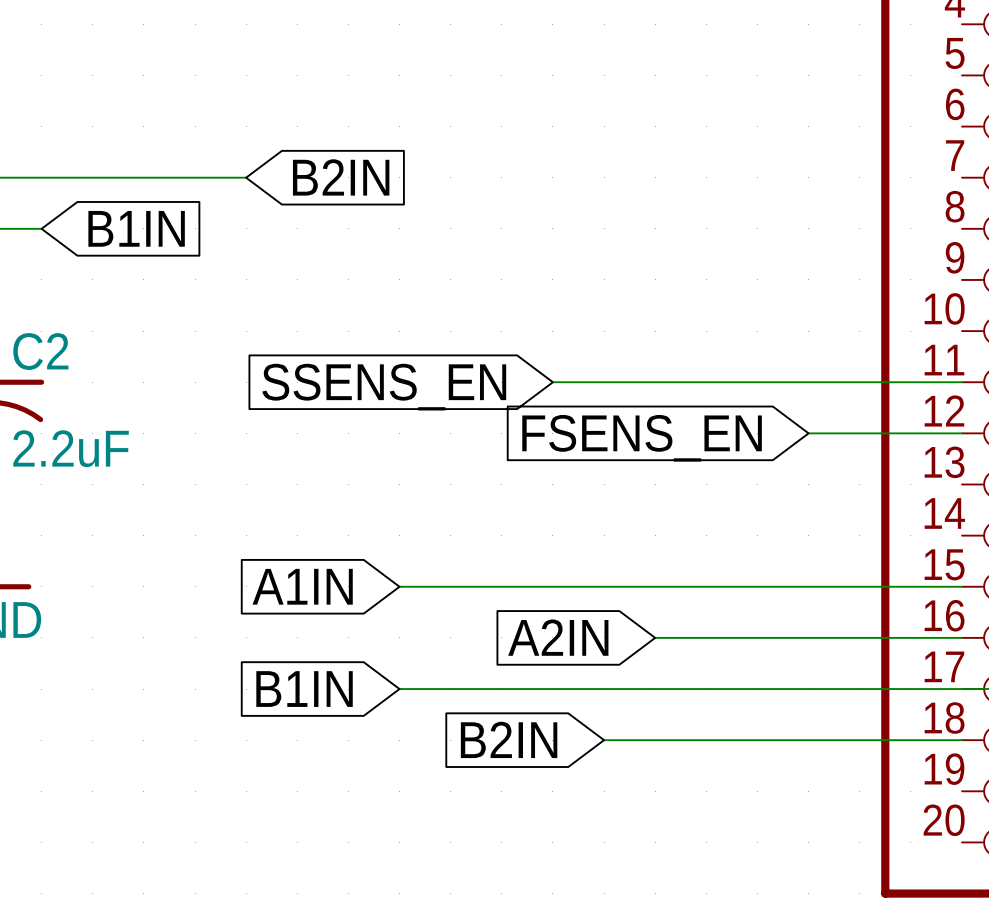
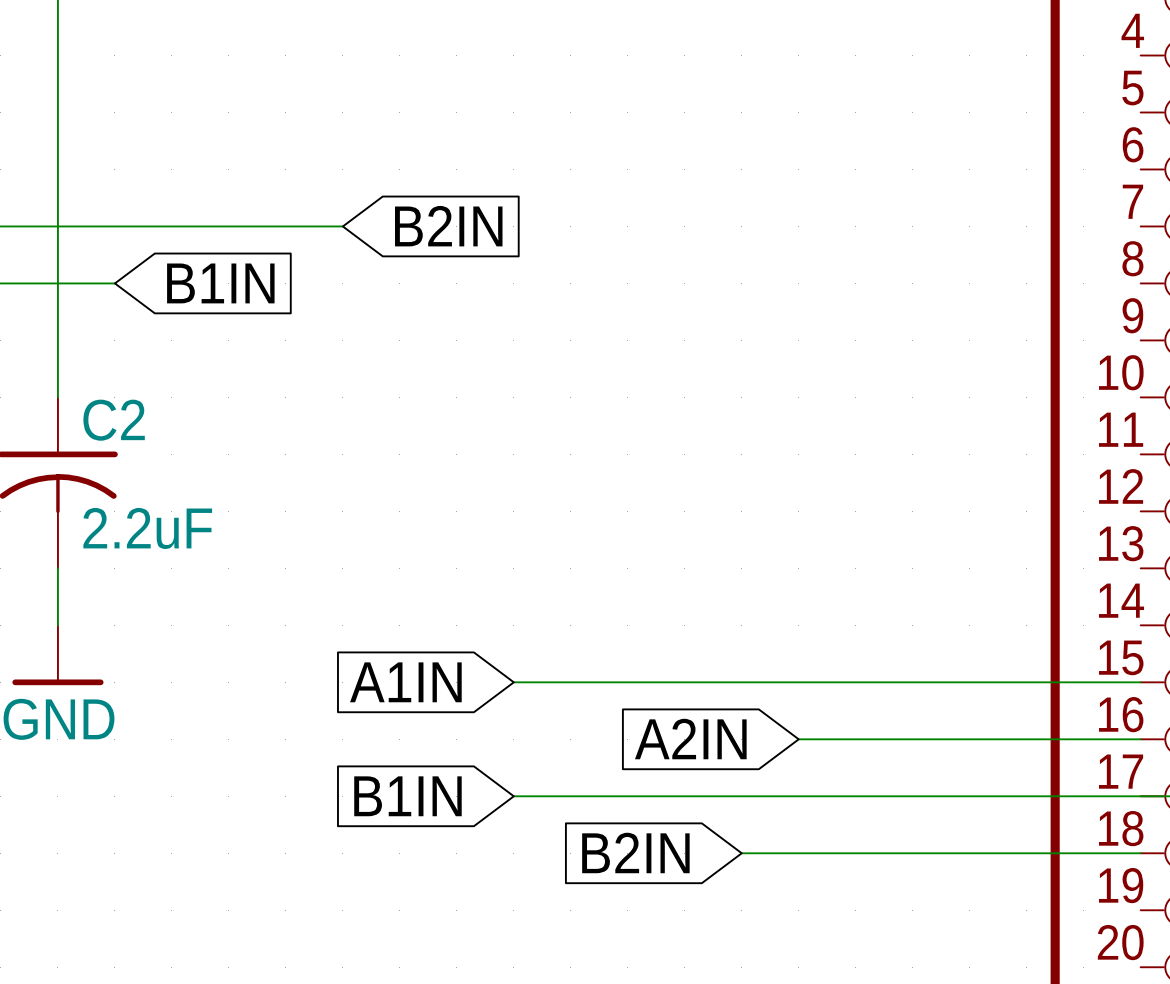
wire: (552, 382) (962, 382) -> none
global label: SSENS_EN (384, 387) -> none
wire: (808, 433) (962, 433) -> none
global label: FSENS_EN (642, 438) -> none

